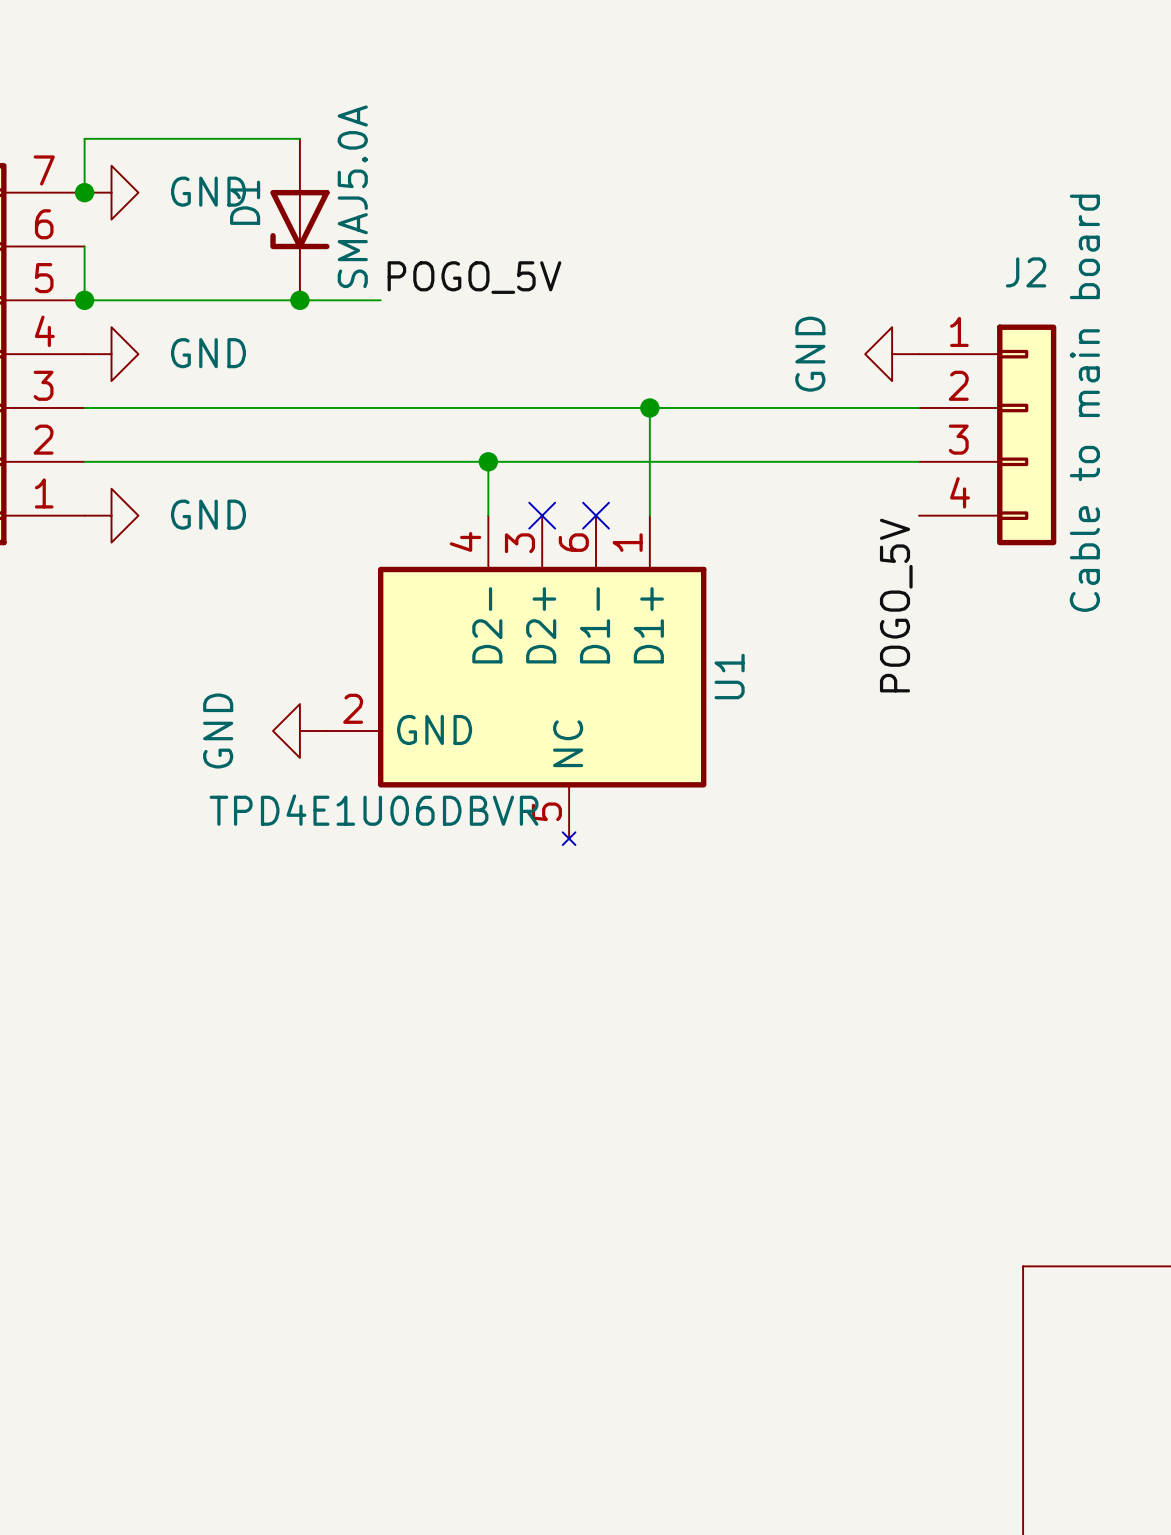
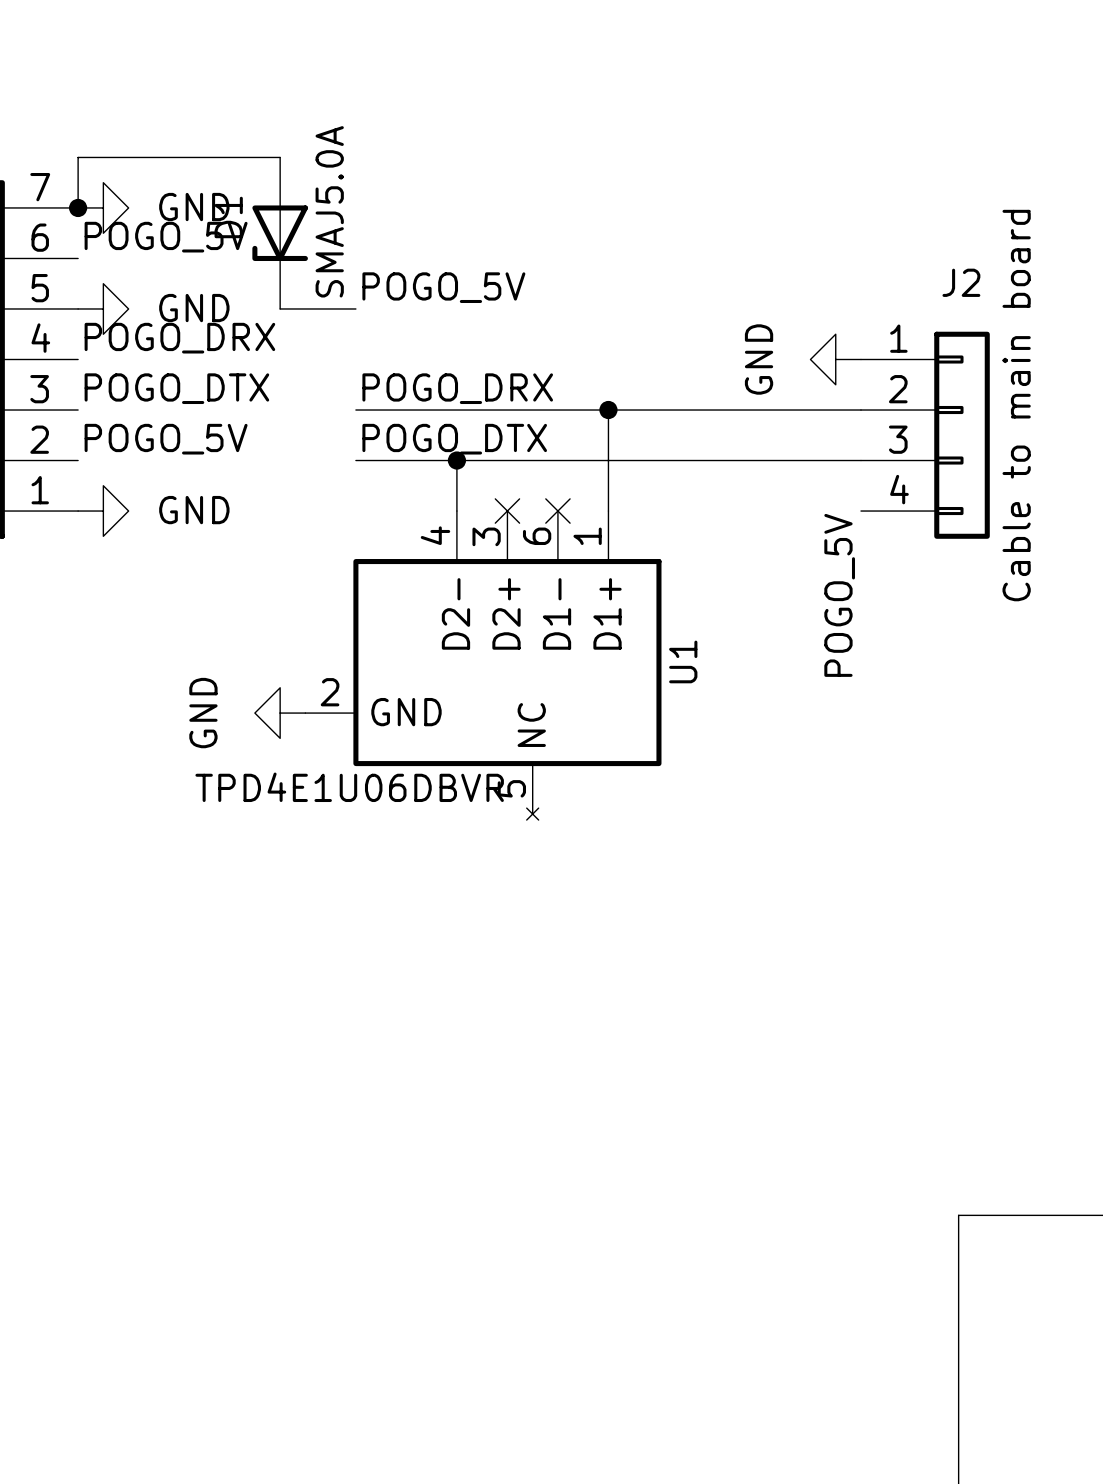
label: none -> POGO_5V (166, 237)
wire: (84, 246) (84, 300) (299, 300) -> none
junction: (84, 300) -> none
junction: (299, 300) -> none
label: none -> POGO_DRX (179, 338)
power symbol position: GND (111, 354) -> GND (103, 308)
label: none -> POGO_DTX (176, 388)
label: none -> POGO_DRX (457, 388)
wire: (84, 407) (380, 407) -> none
label: none -> POGO_5V (166, 439)
label: none -> POGO_DTX (454, 439)
wire: (84, 461) (380, 461) -> none

